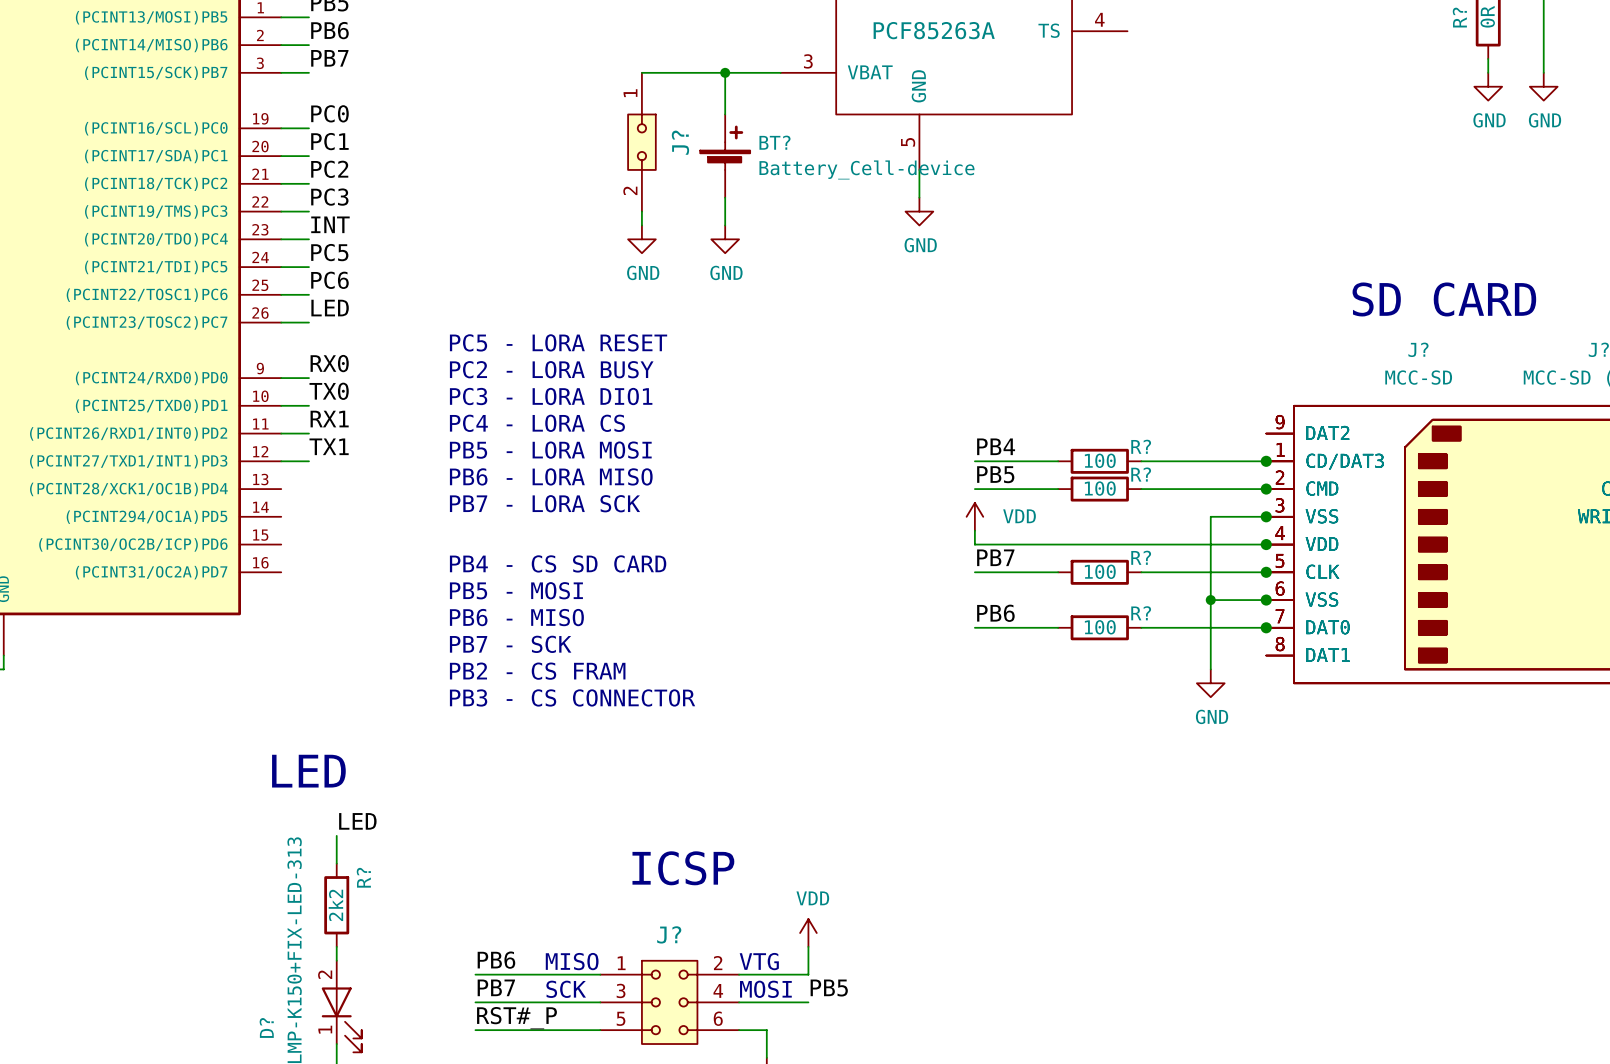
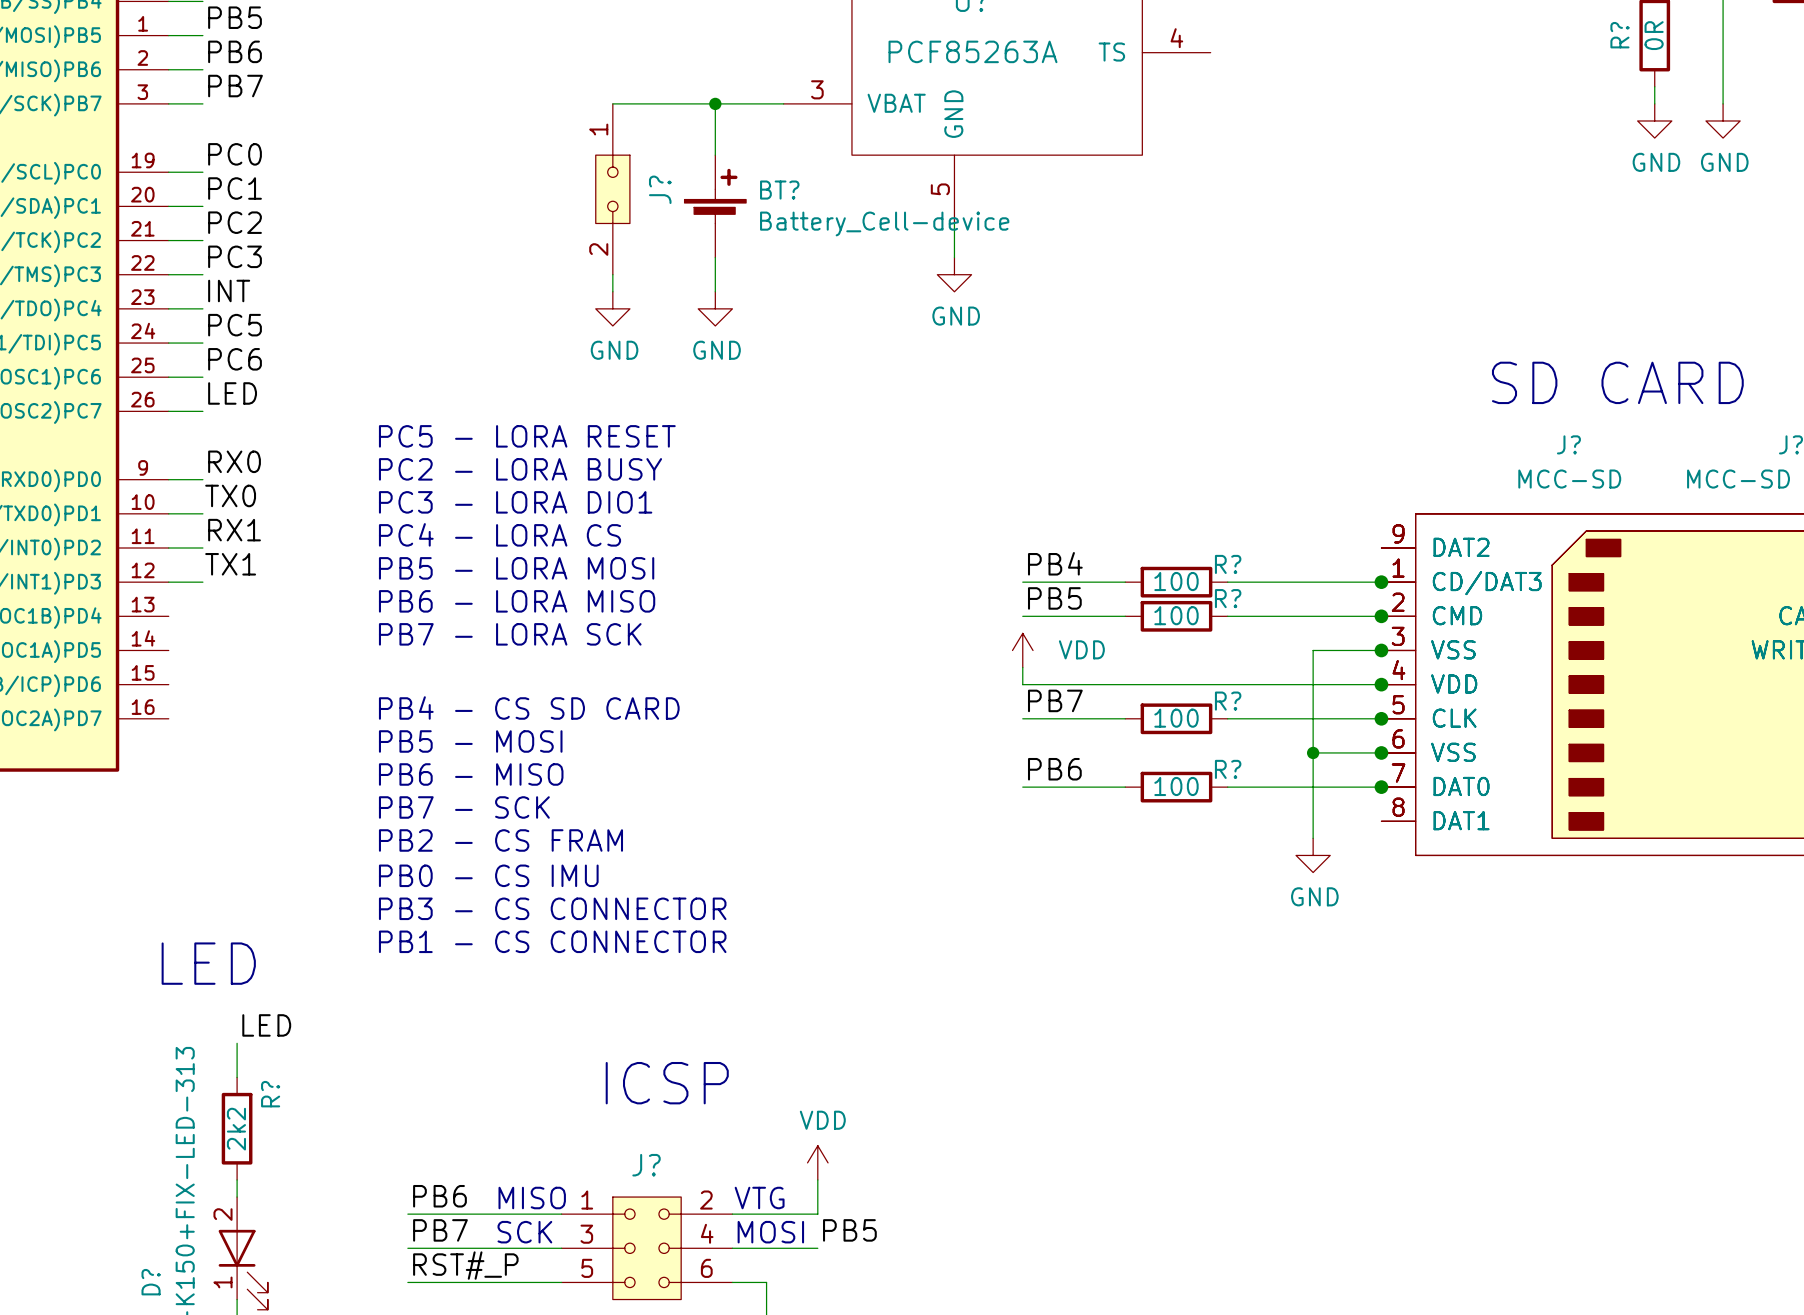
text: PB3 - CS CONNECTOR (572, 697) -> PB0 - CS IMU (488, 875)
text: none -> PB3 - CS CONNECTOR (552, 908)
text: none -> PB1 - CS CONNECTOR (552, 941)

